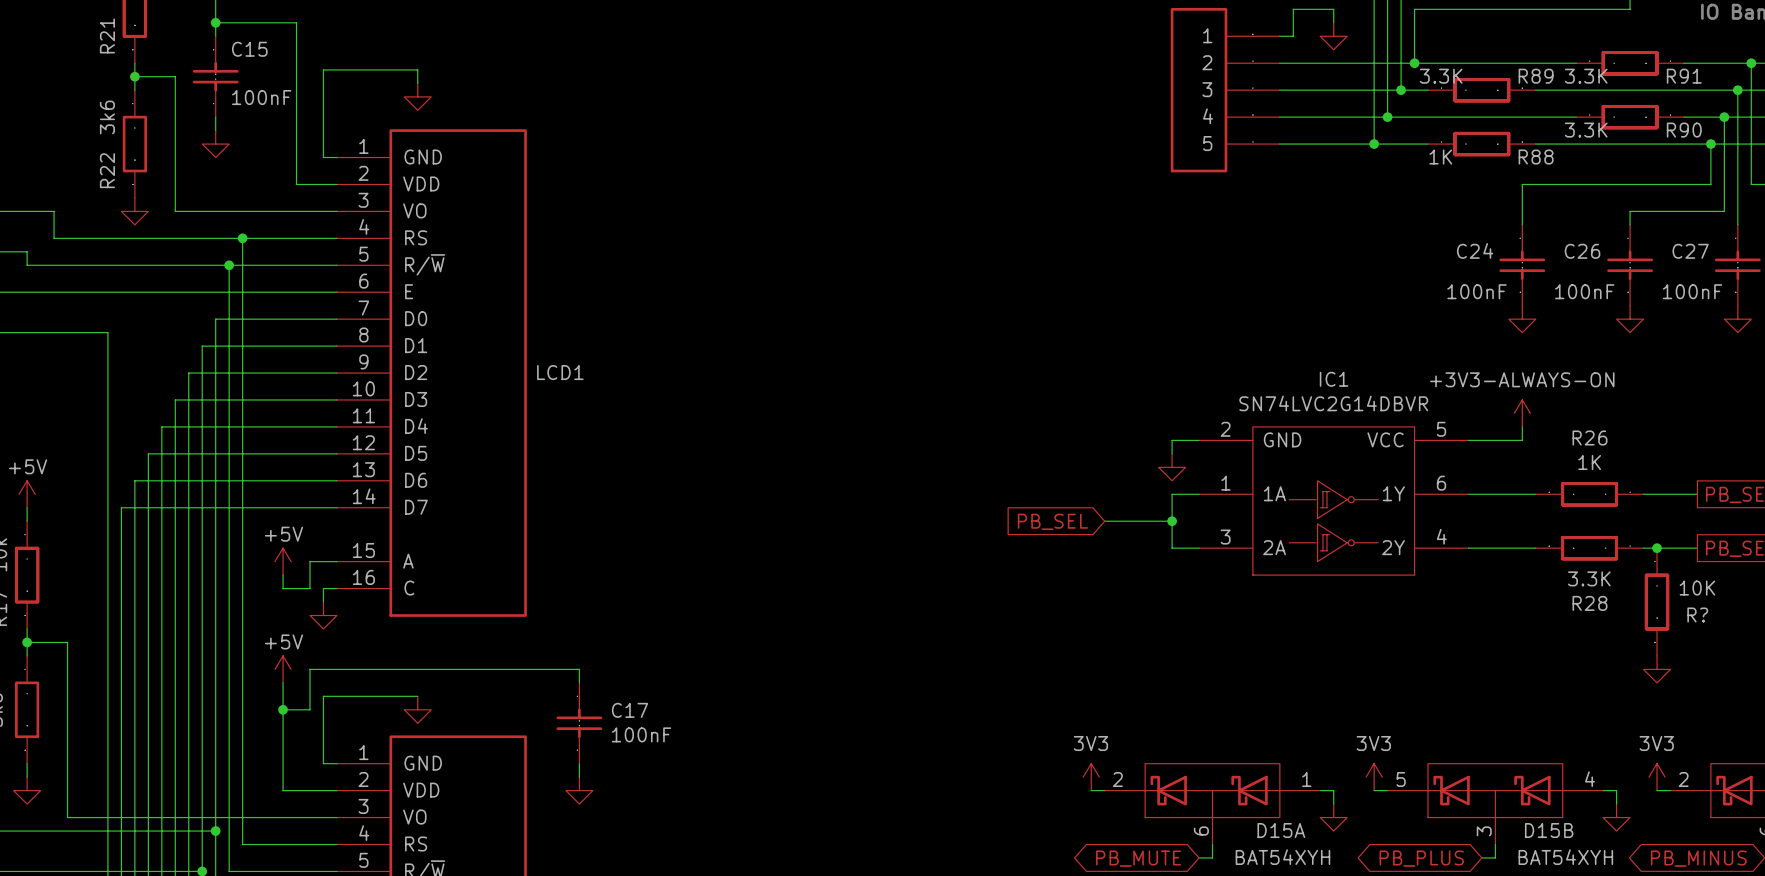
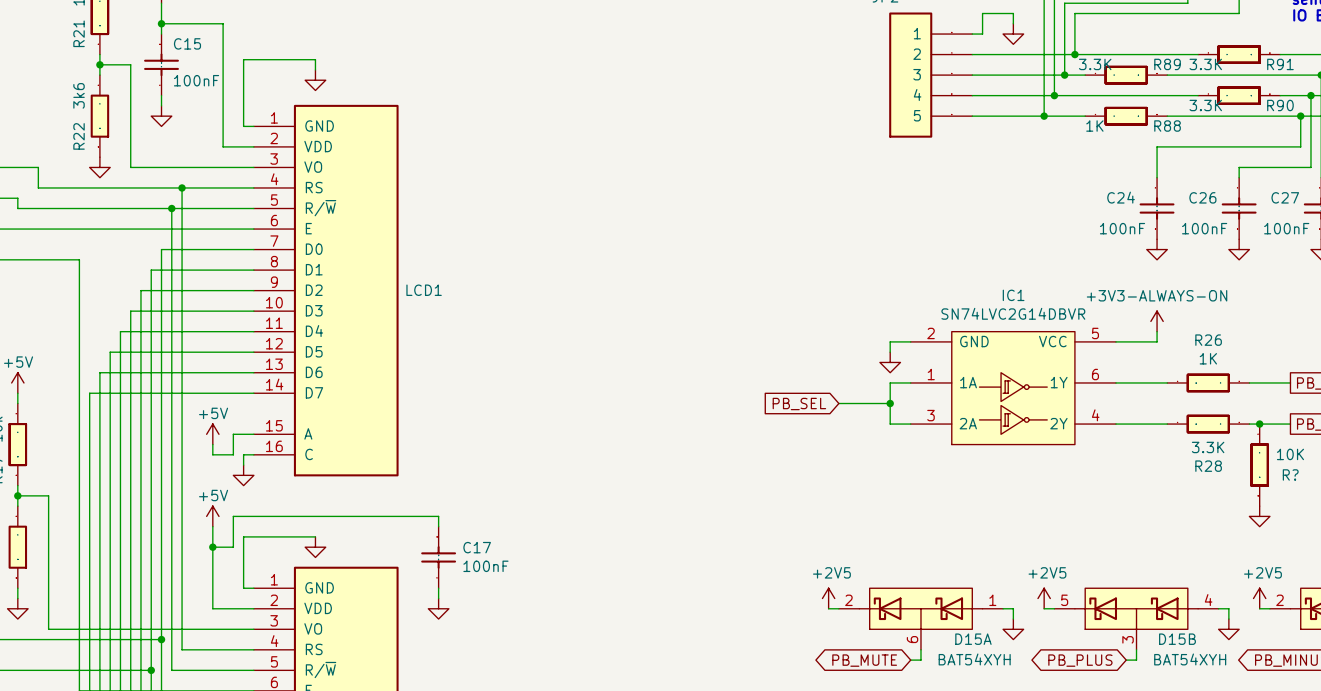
power symbol: 3V3 (1091, 777) -> +2V5 (828, 598)
power symbol: 3V3 (1374, 777) -> +2V5 (1044, 598)
power symbol: 3V3 (1657, 777) -> +2V5 (1259, 598)

